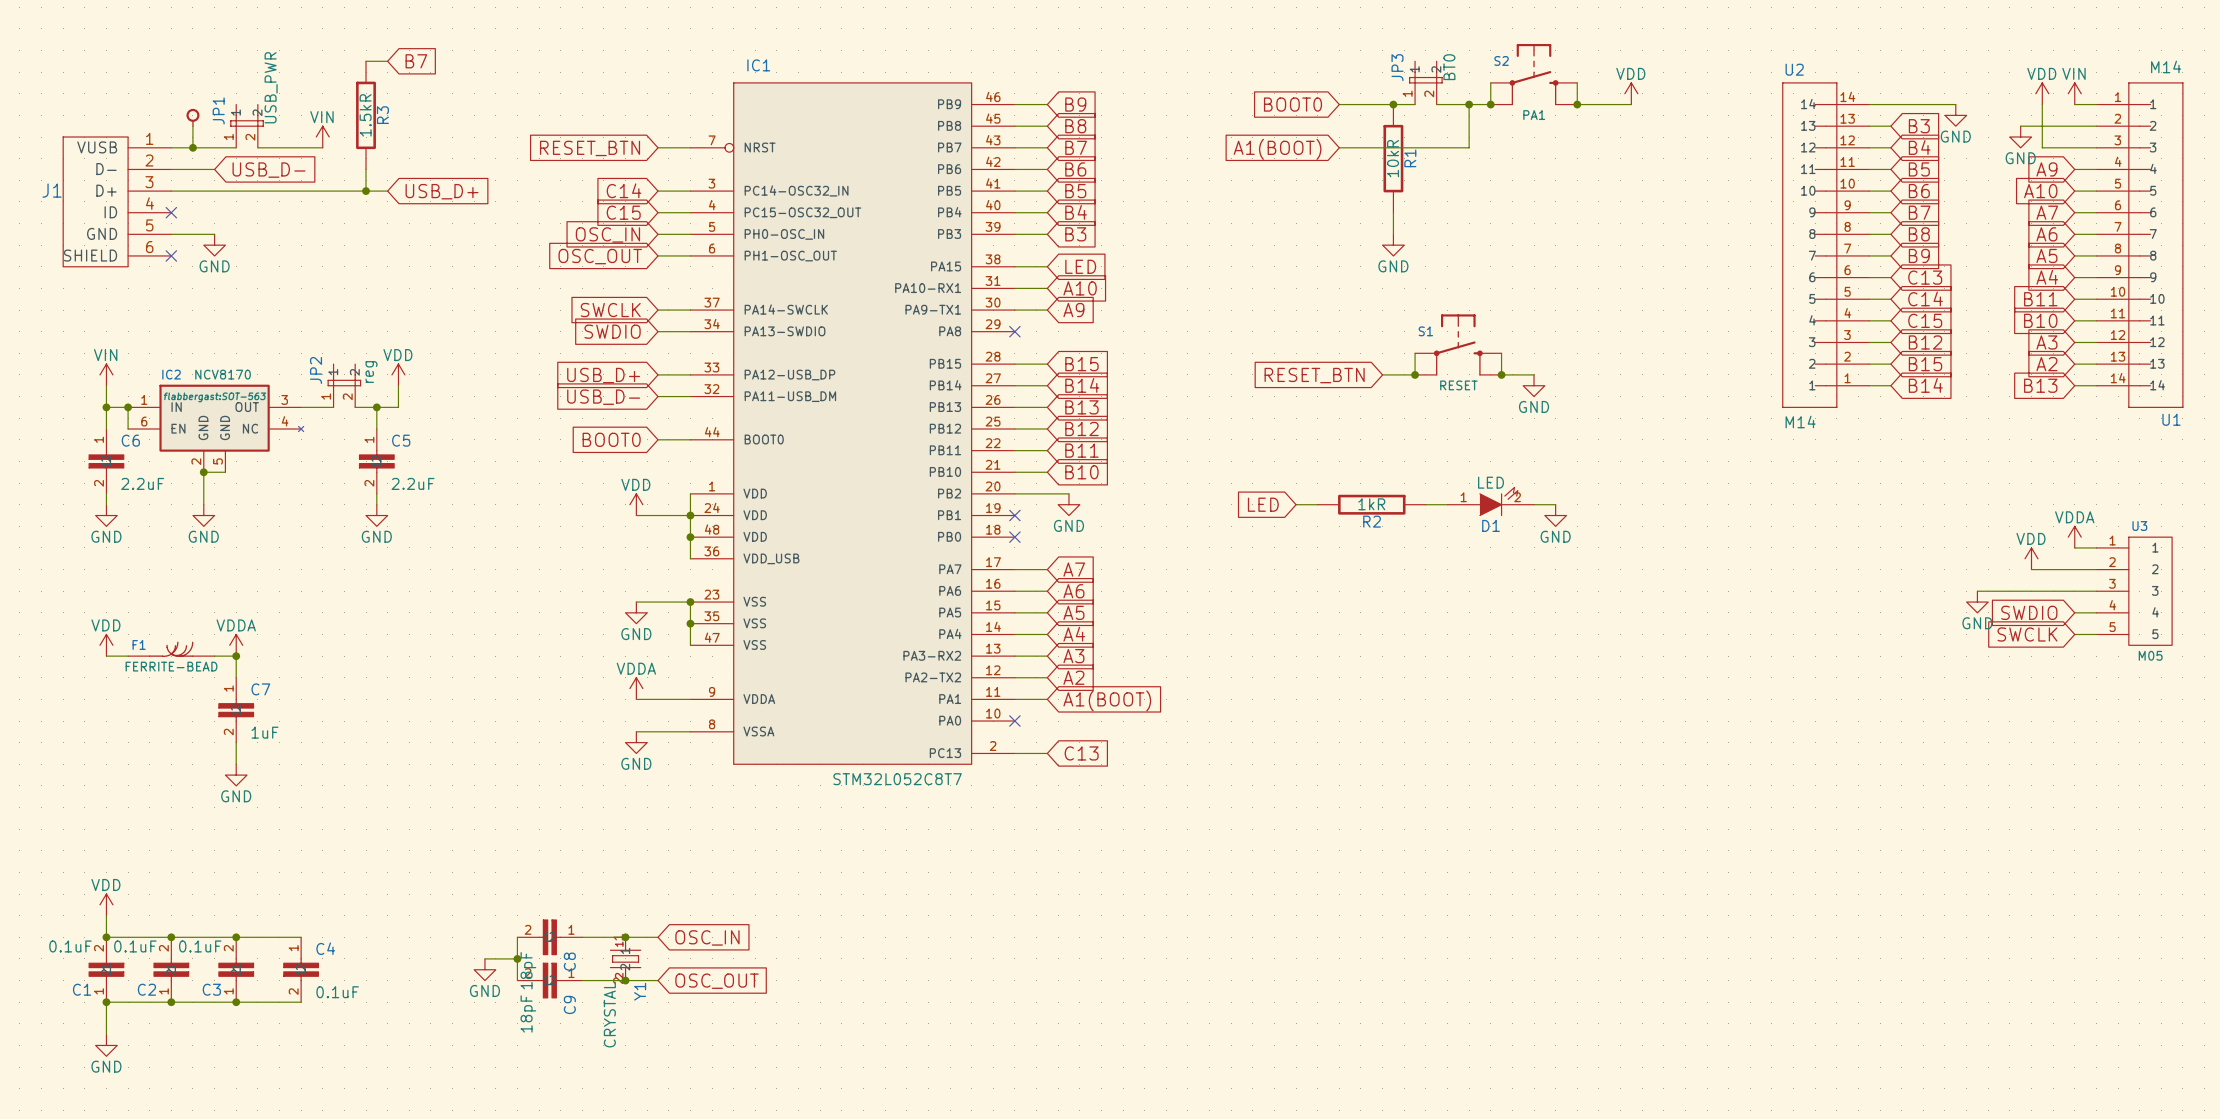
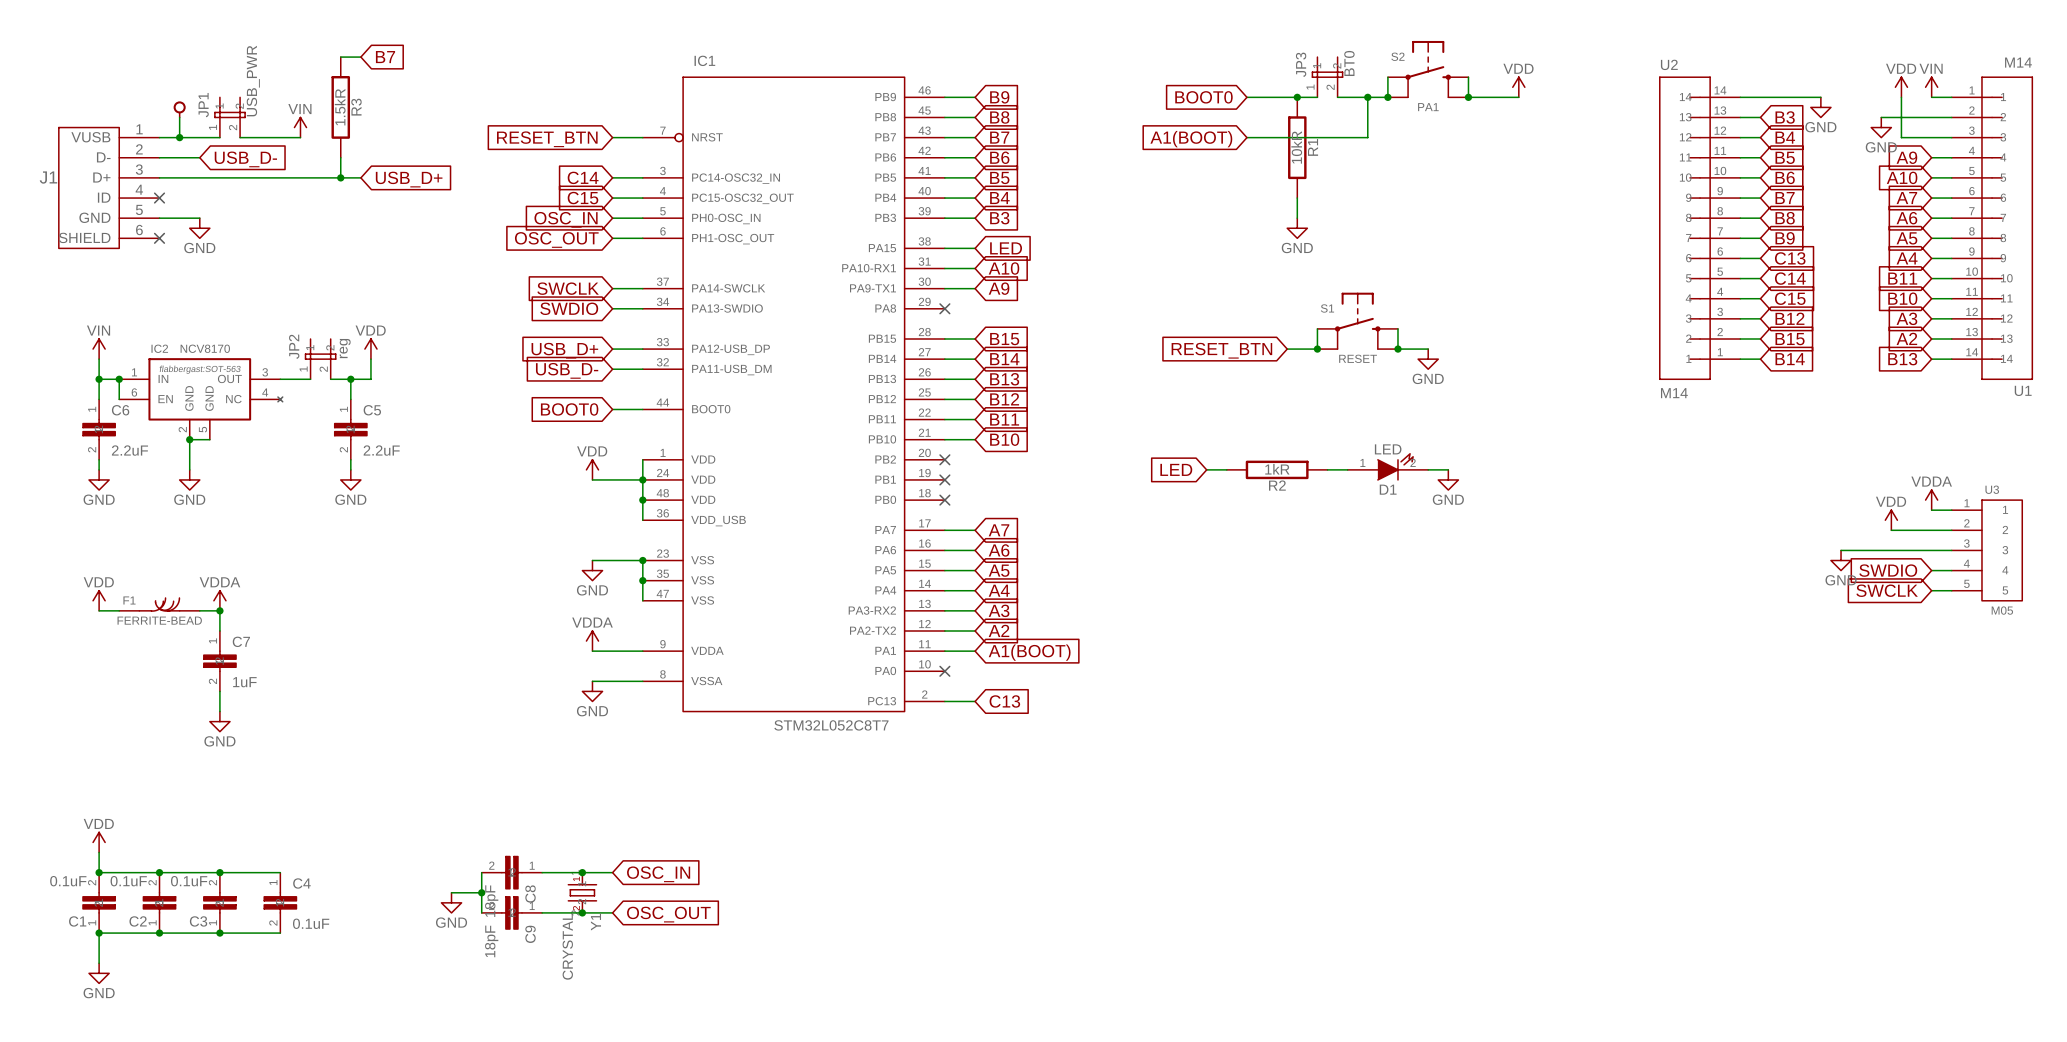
wire: (1014, 493) (1068, 493) -> none
no-connect mark: none -> (944, 459)
power symbol: GND (1068, 504) -> none

